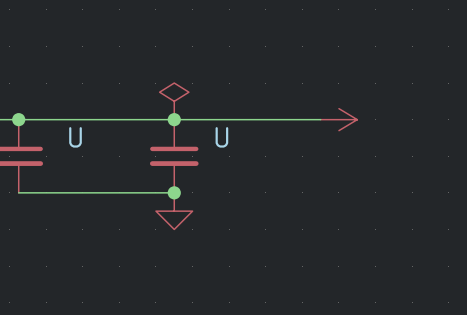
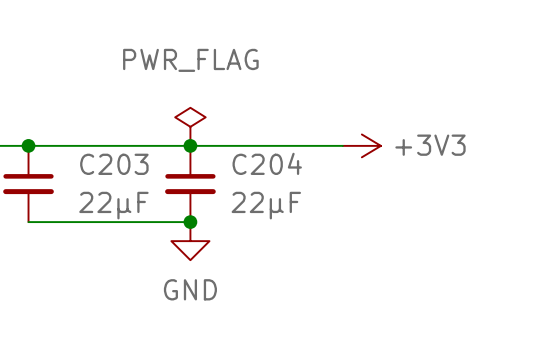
power symbol text: none -> PWR_FLAG (190, 60)
power symbol text: none -> +3V3 (430, 145)
U name: U (75, 137) -> C203 (114, 164)
U name: U (221, 137) -> C204 (267, 163)
U value: none -> 22µF (113, 205)
U value: none -> 22µF (266, 205)
power symbol text: none -> GND (190, 289)

